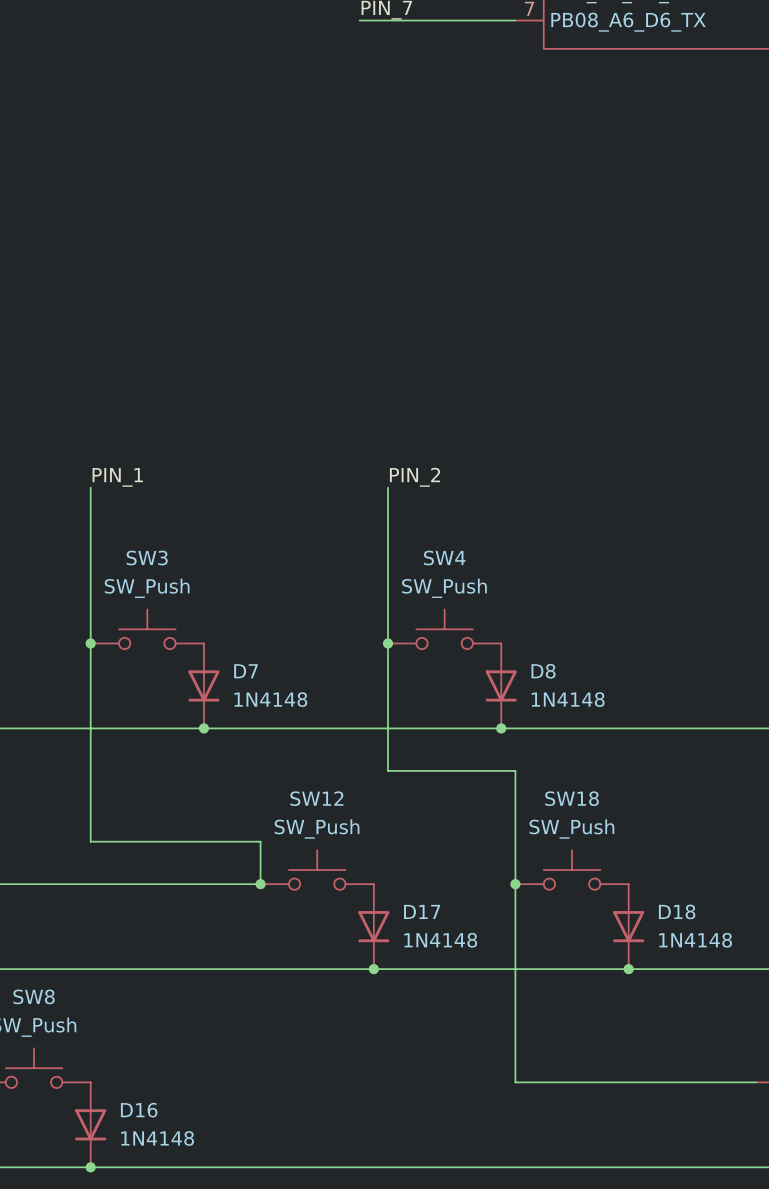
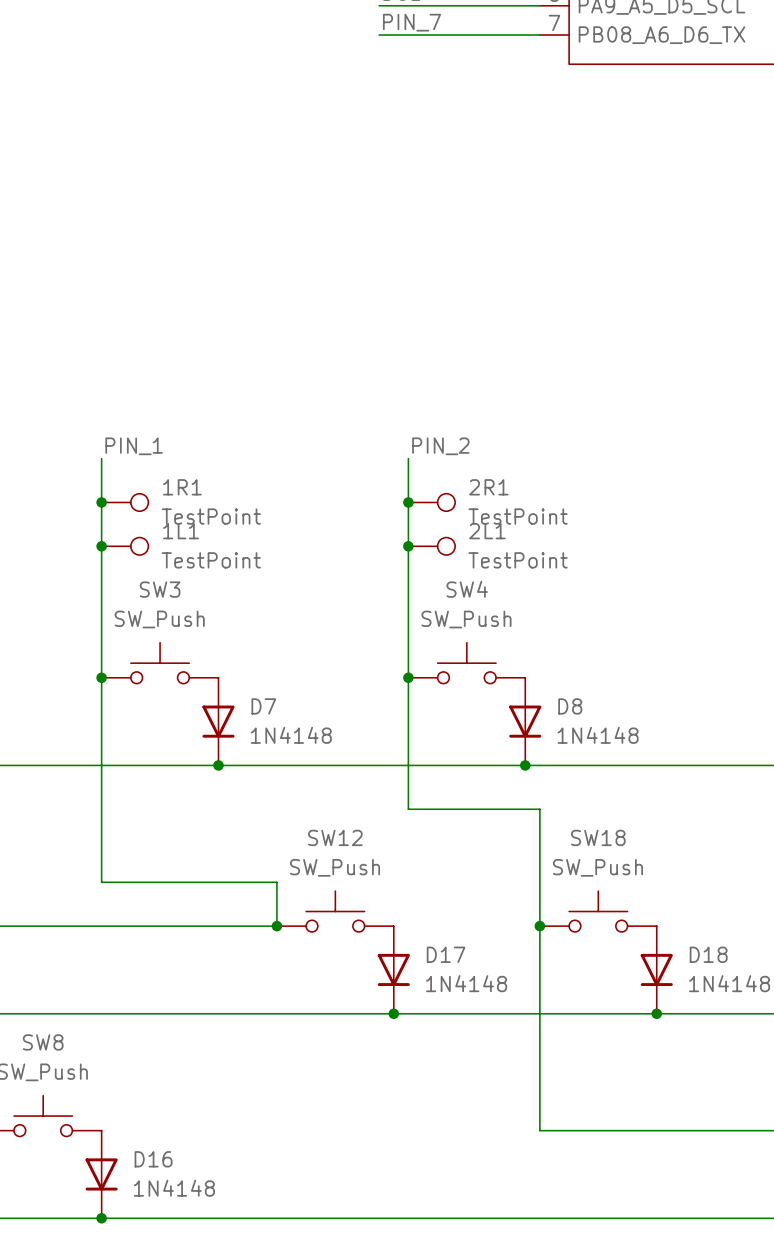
wire: none -> (101, 458) (101, 517)
wire: none -> (408, 458) (408, 517)
junction: none -> (101, 502)
1R1: none -> TestPoint (124, 502)
junction: none -> (408, 502)
2R1: none -> TestPoint (431, 502)
label position: PIN_1 (117, 477) -> PIN_1 (134, 446)
label position: PIN_2 (415, 477) -> PIN_2 (440, 446)
junction: none -> (101, 546)
1L1: none -> TestPoint (124, 546)
junction: none -> (408, 546)
2L1: none -> TestPoint (431, 546)

